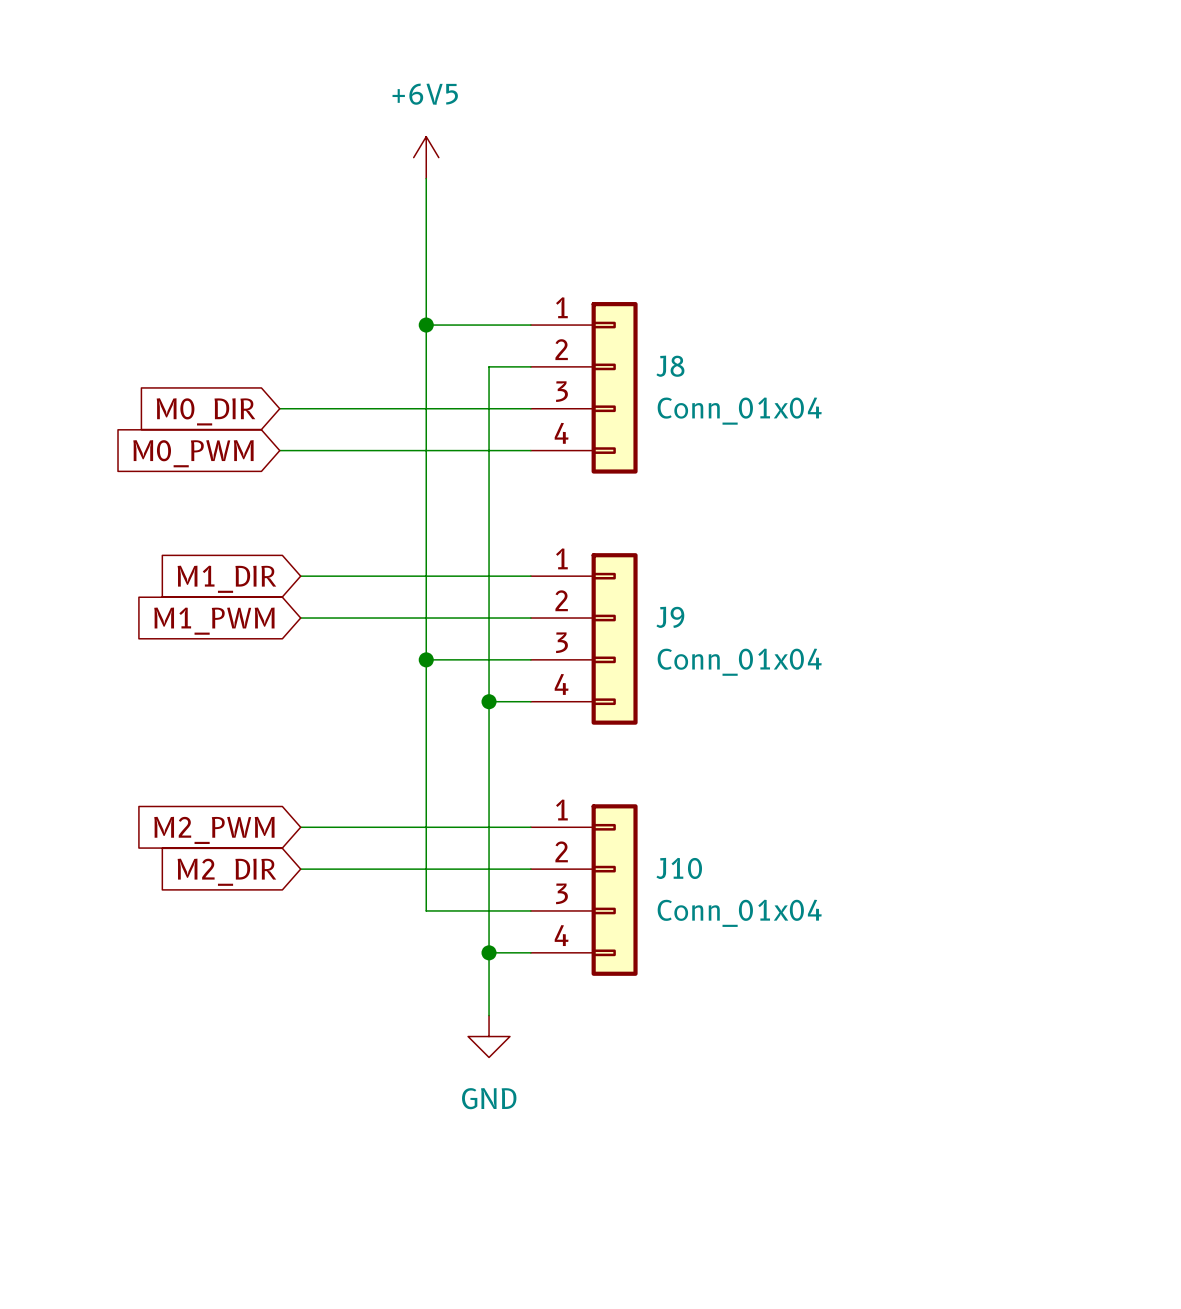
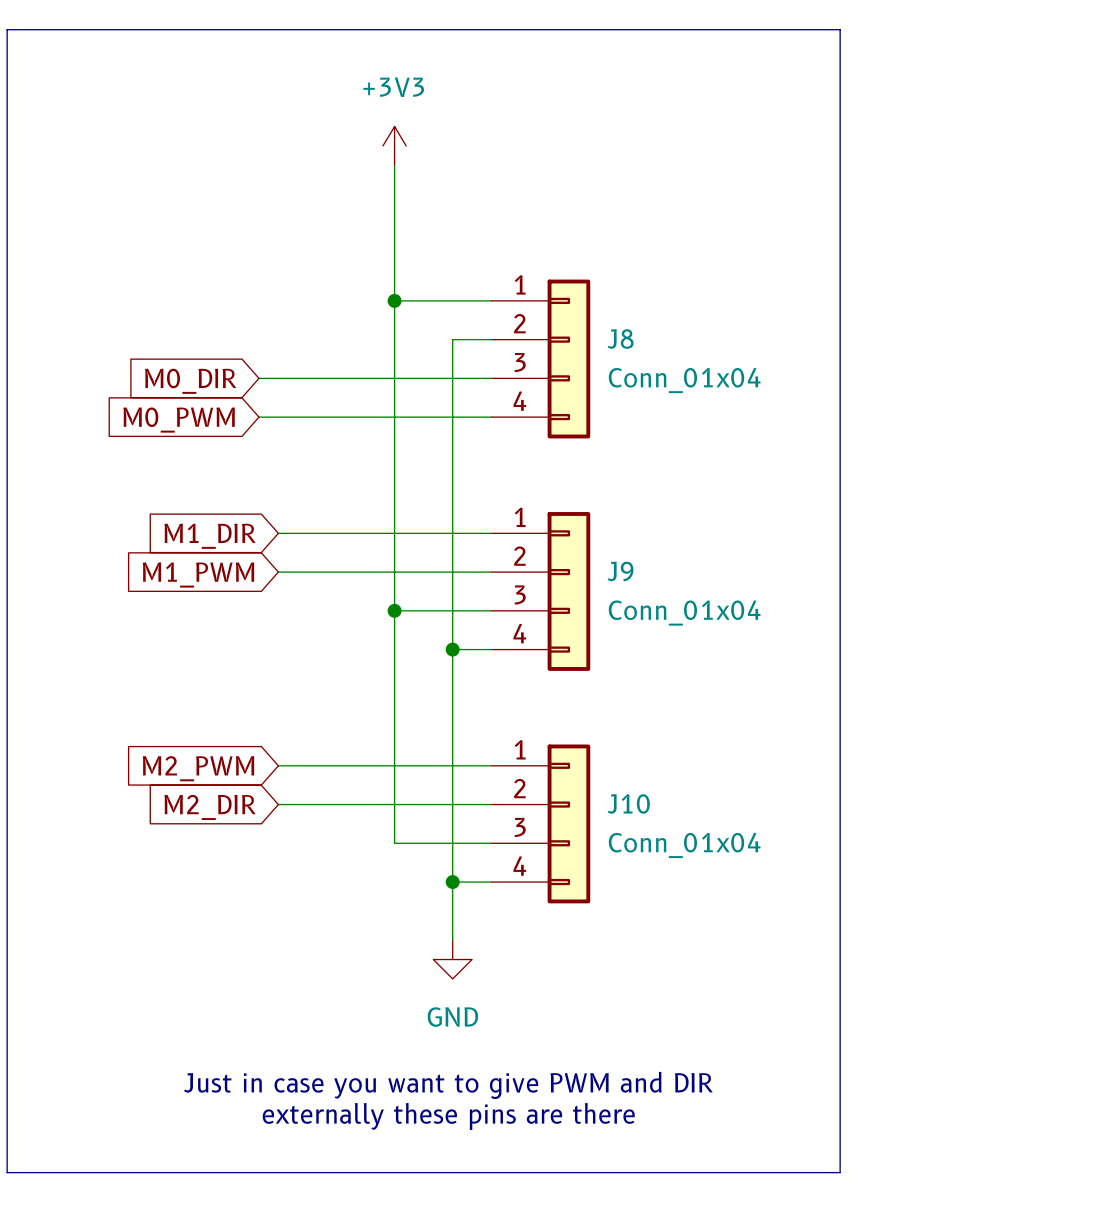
line: none -> (7, 29) (840, 29) (840, 1172) (7, 1172) (7, 29)
power symbol: +6V5 (426, 157) -> +3V3 (394, 145)
text: none -> Just in case you want to give PWM and DIR (448, 1085)
text: none -> externally these pins are there (448, 1116)

